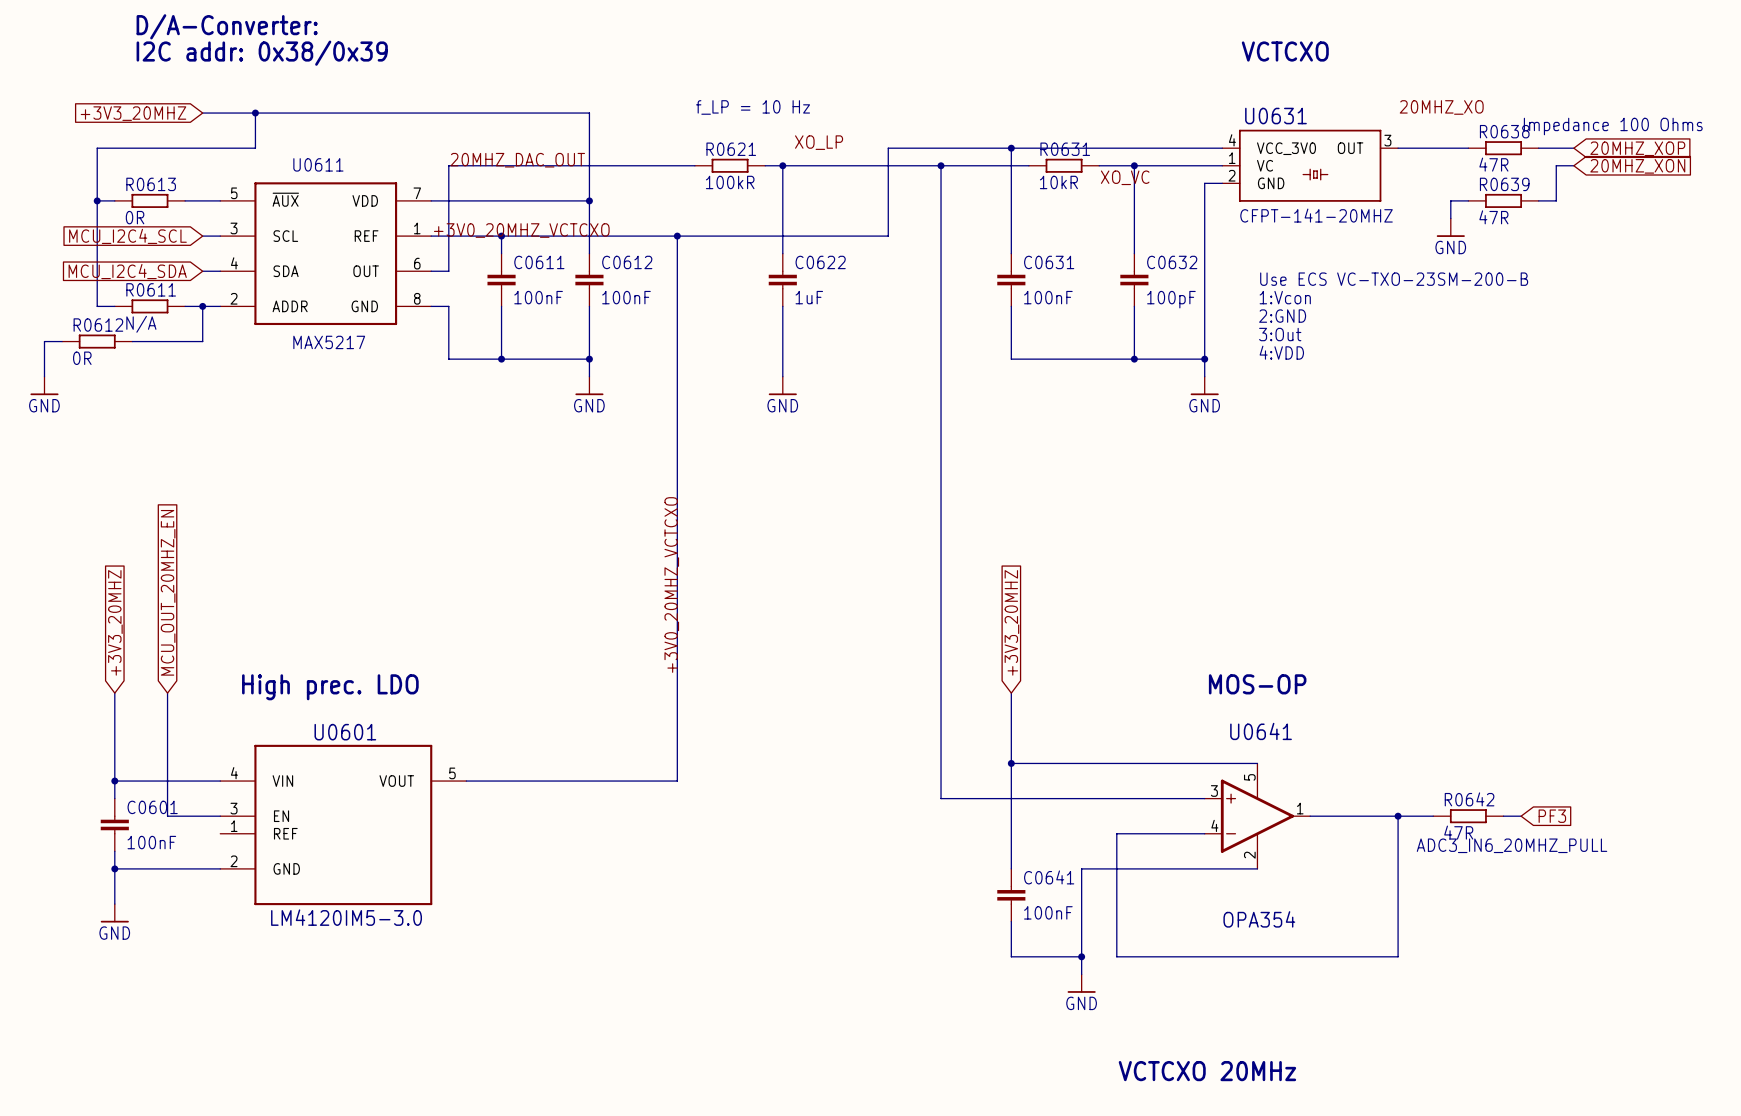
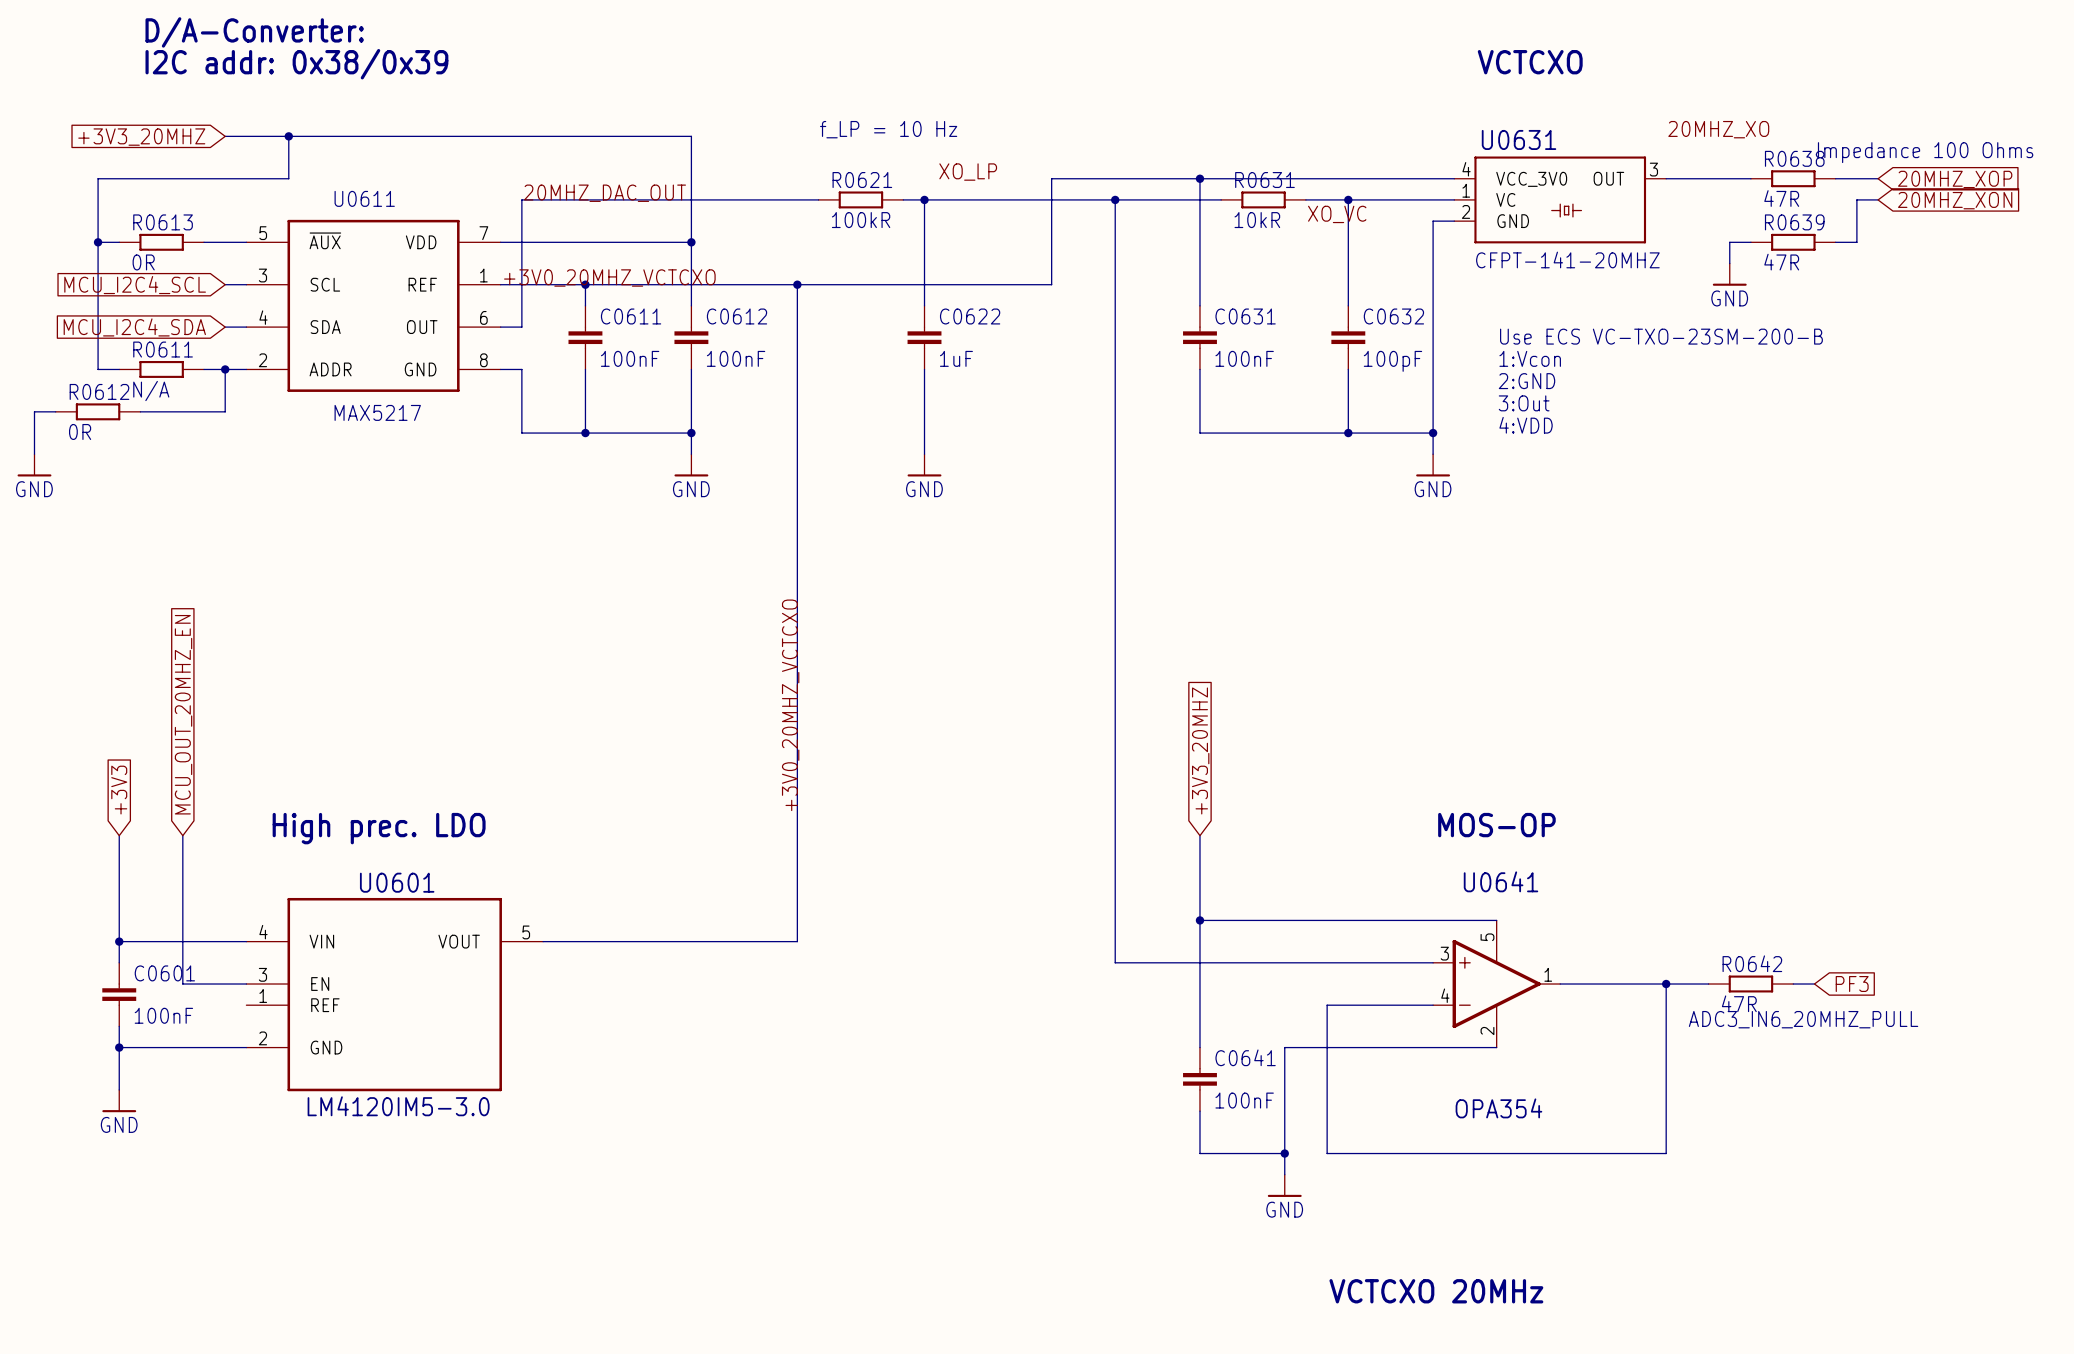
global label: +3V3_20MHZ (115, 622) -> +3V3 (119, 790)

